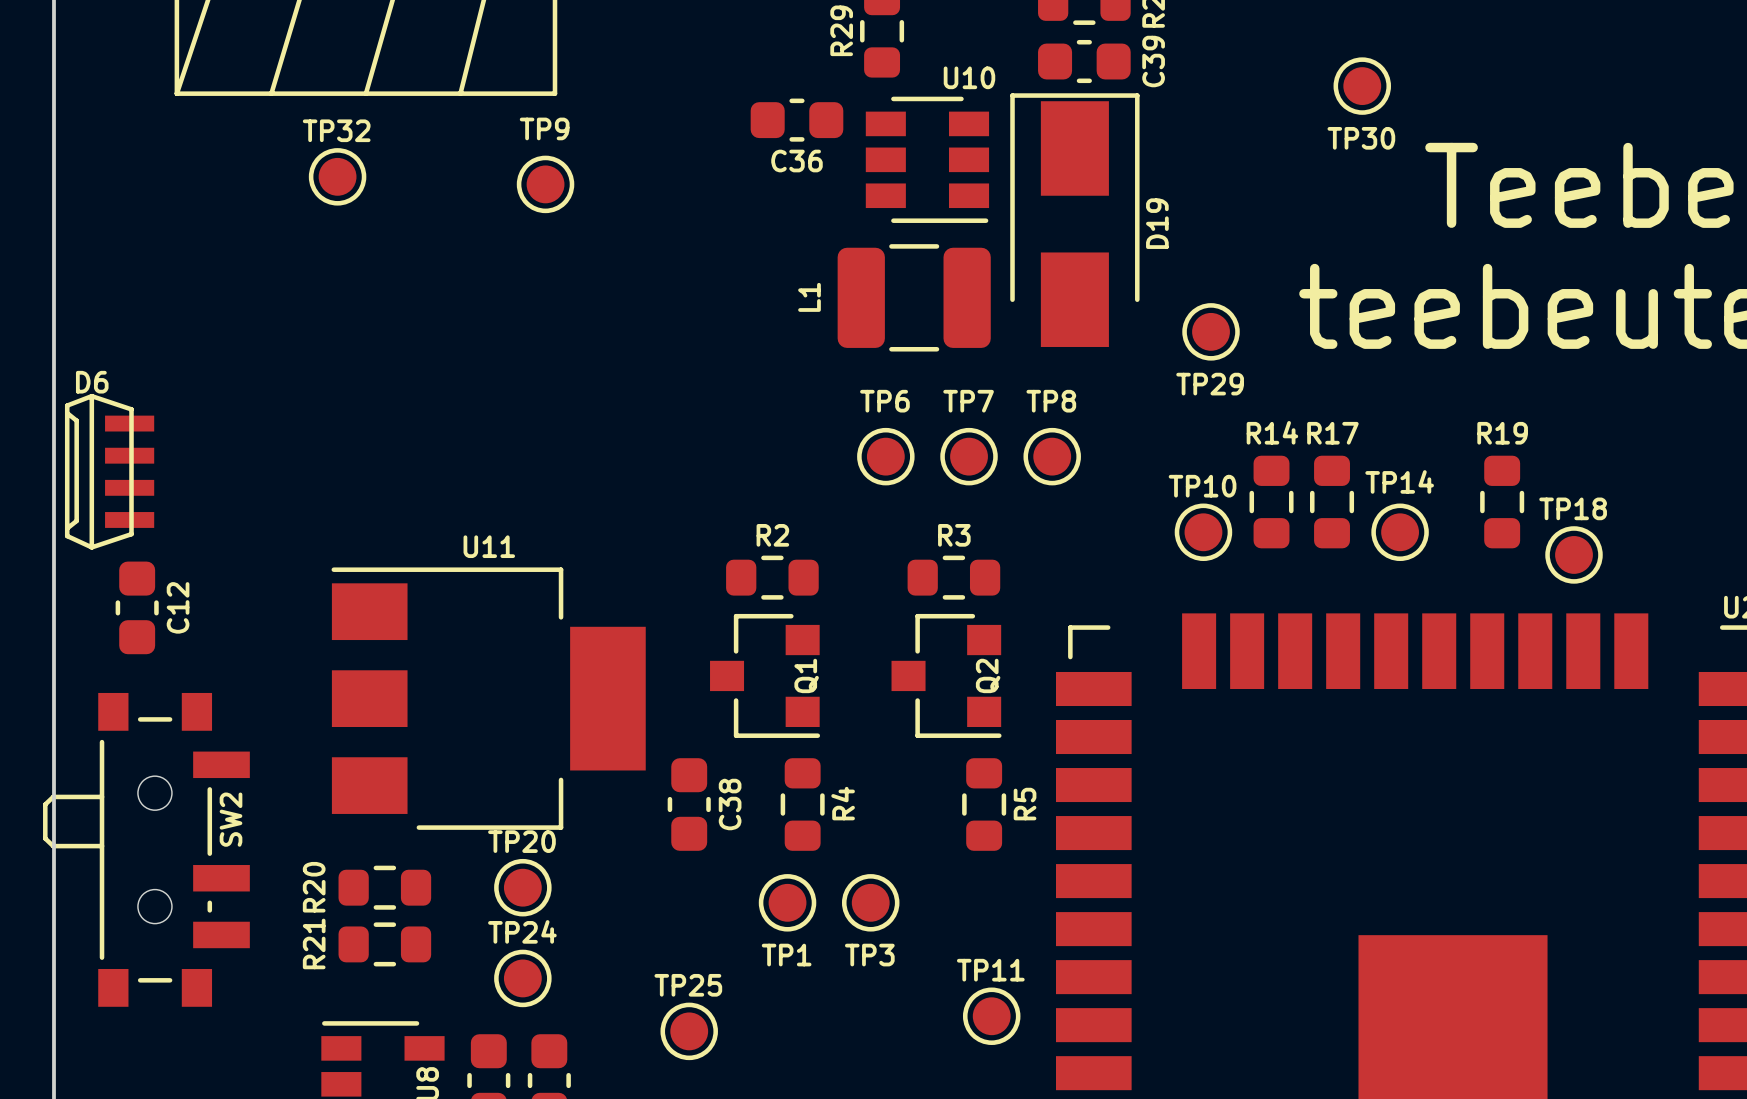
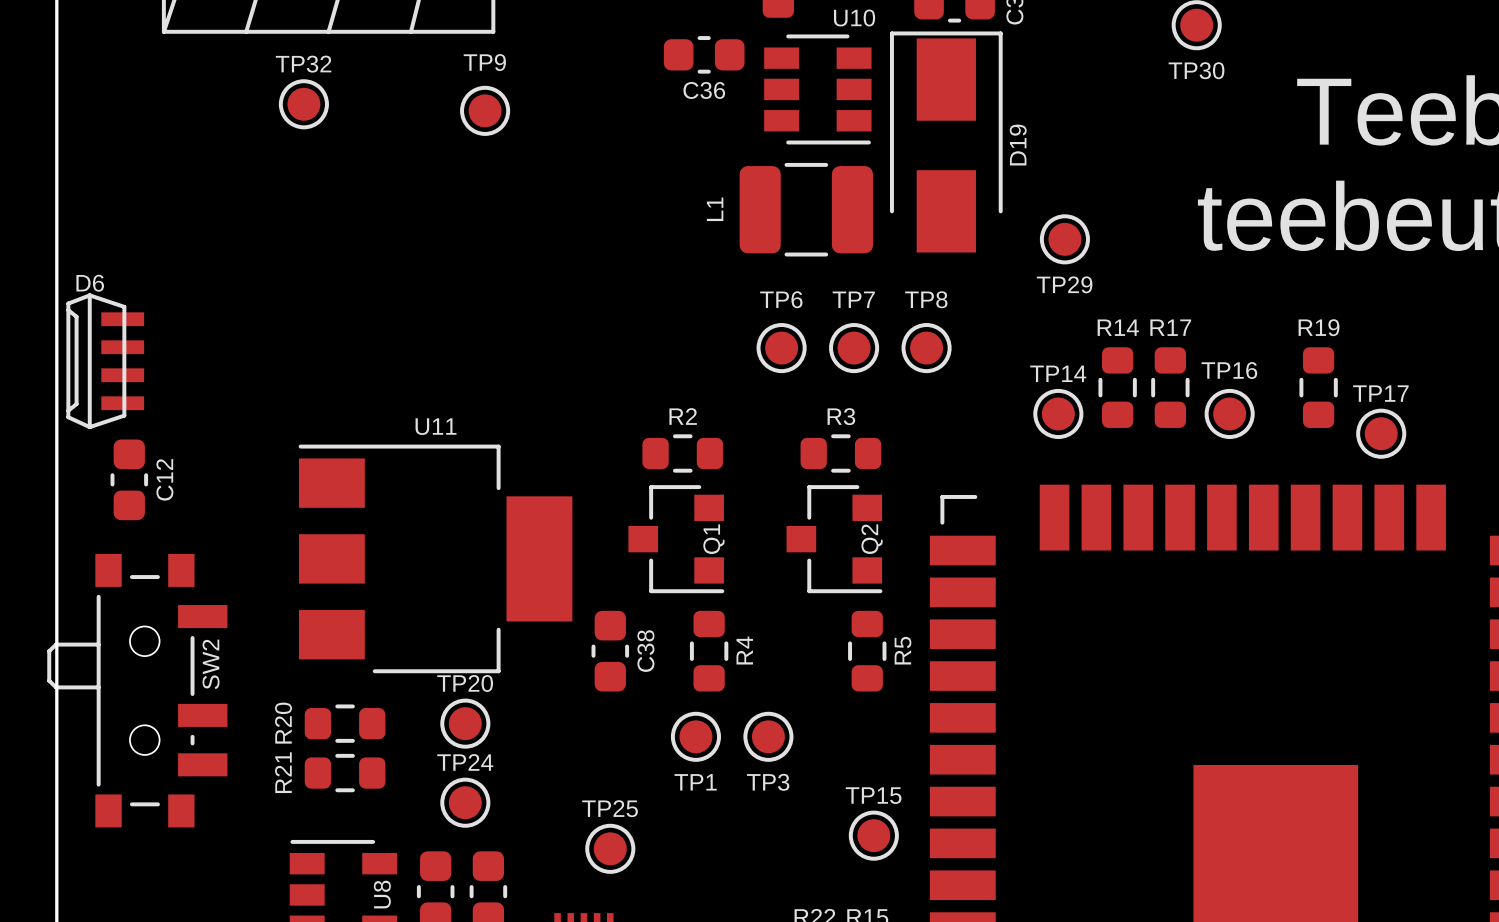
TP14 name: TP14 (1399, 481) -> TP16 (1229, 370)
TP10 name: TP10 (1202, 486) -> TP14 (1058, 373)
TP18 name: TP18 (1573, 508) -> TP17 (1380, 393)
TP11 name: TP11 (990, 970) -> TP15 (873, 795)

